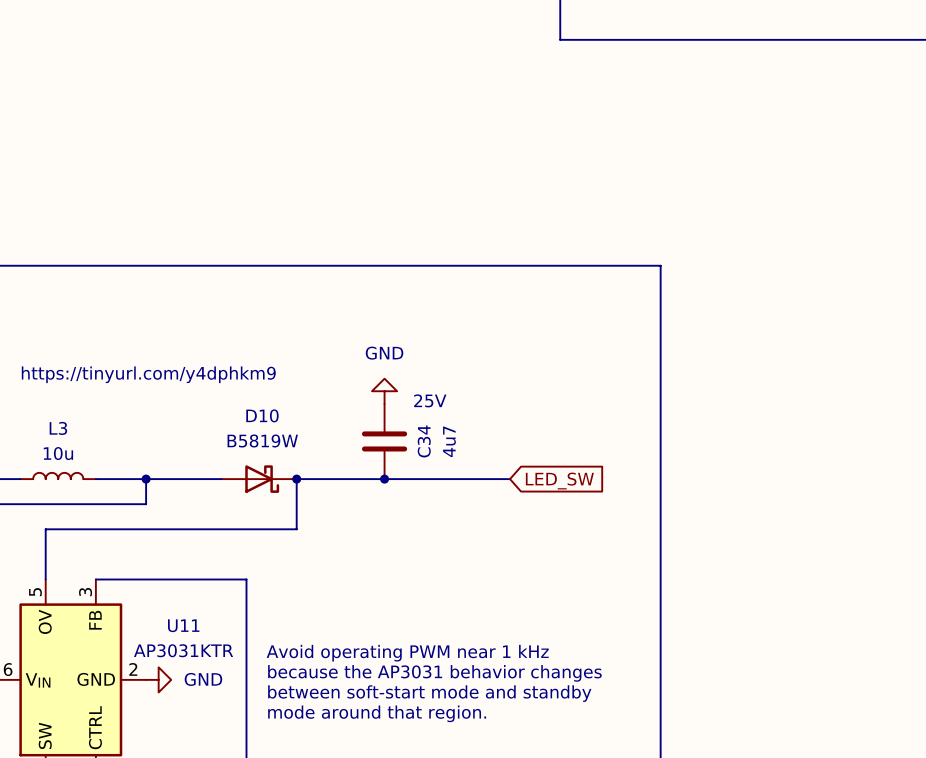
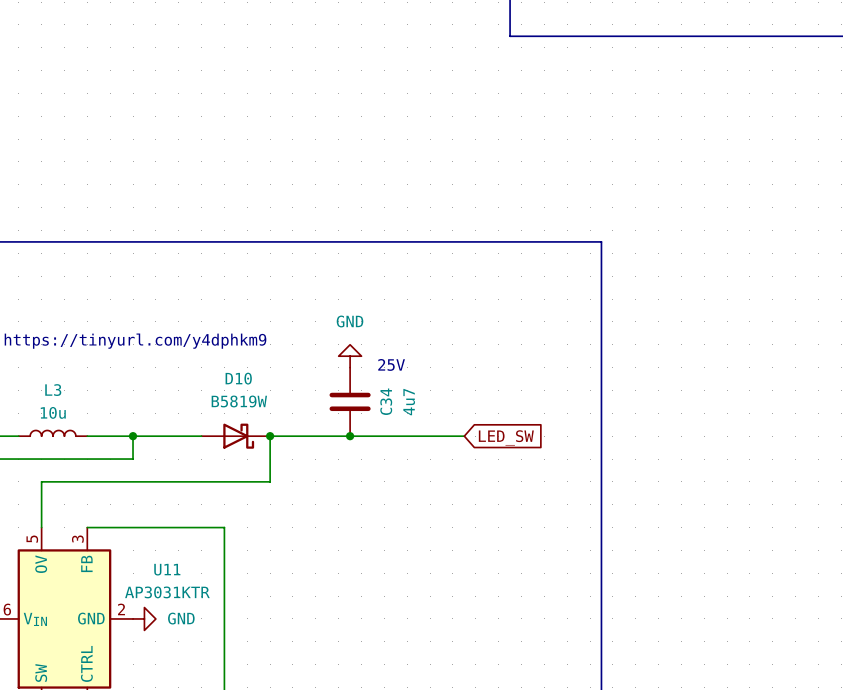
text: Avoid operating PWM near 1 kHz (407, 653) -> none
text: because the AP3031 behavior changes (434, 673) -> none
text: between soft-start mode and standby (429, 693) -> none
text: mode around that region. (377, 713) -> none

